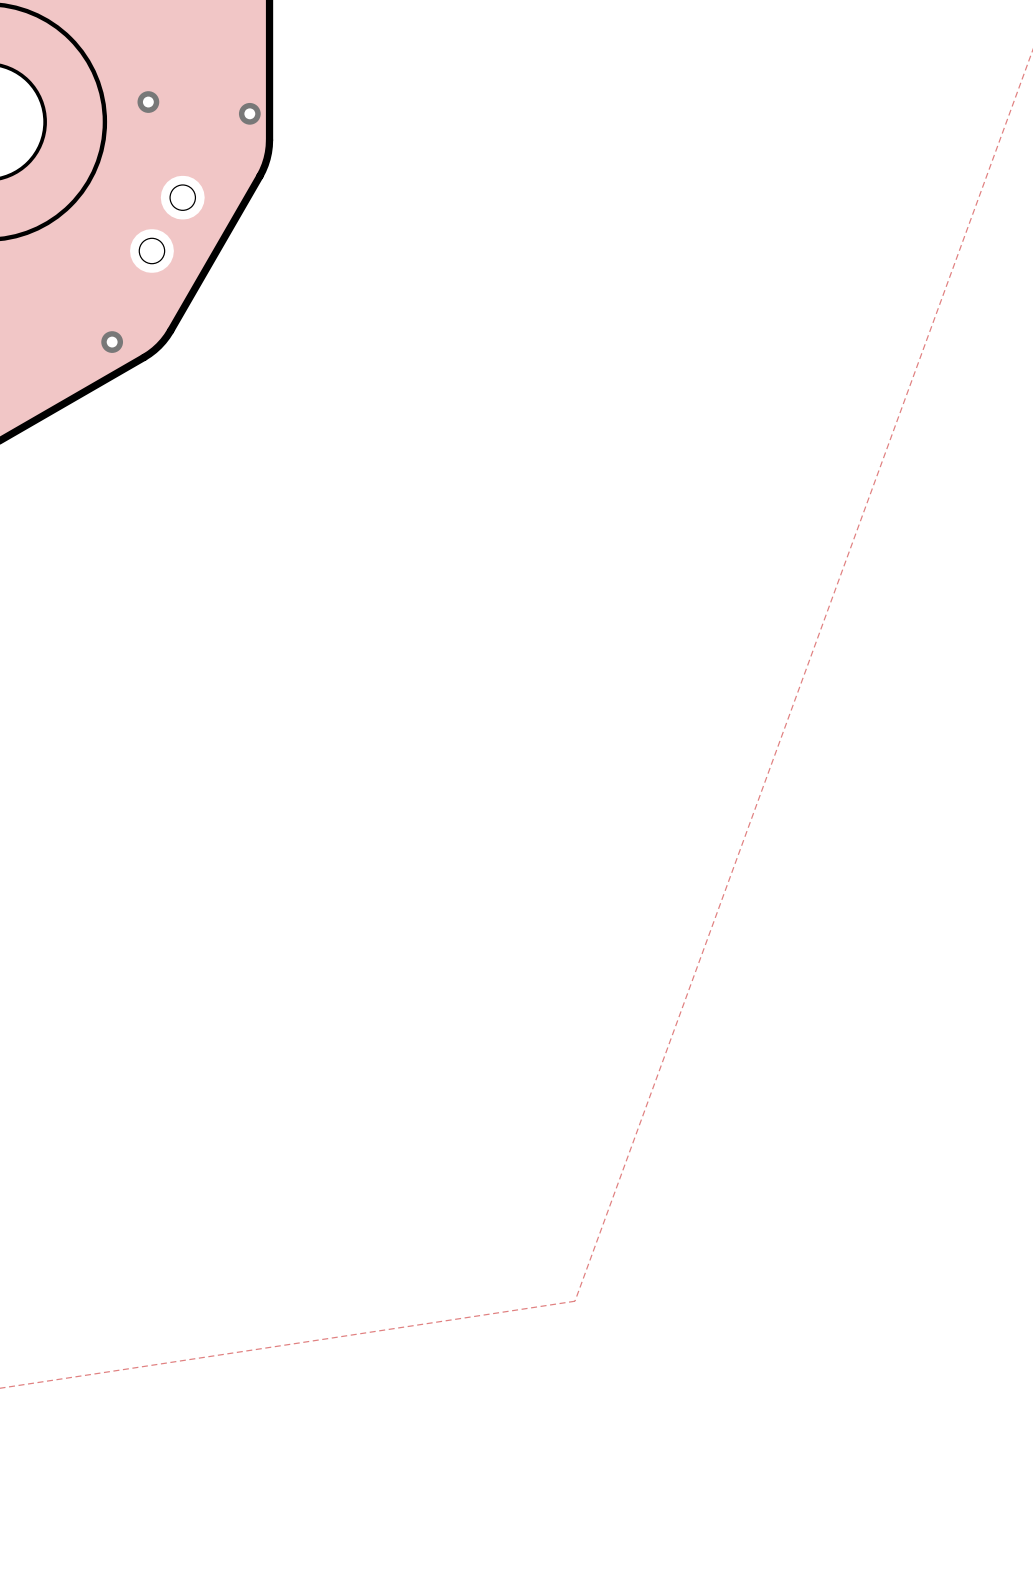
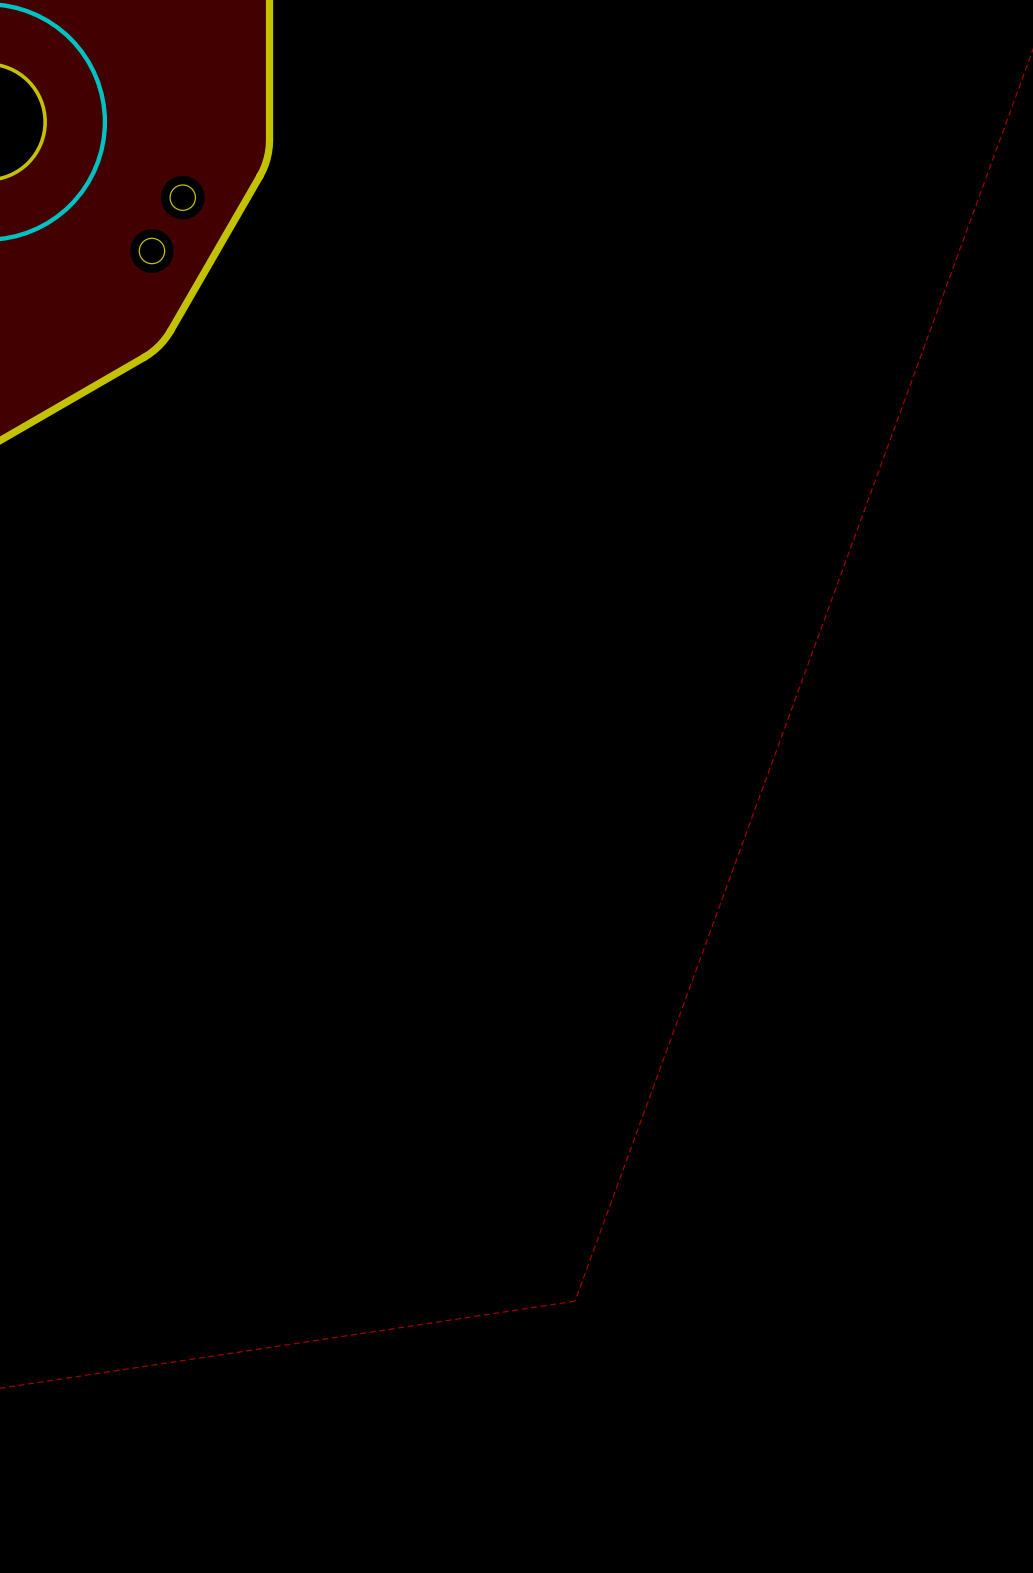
via: (148, 102) -> none
via: (249, 113) -> none
via: (112, 342) -> none

